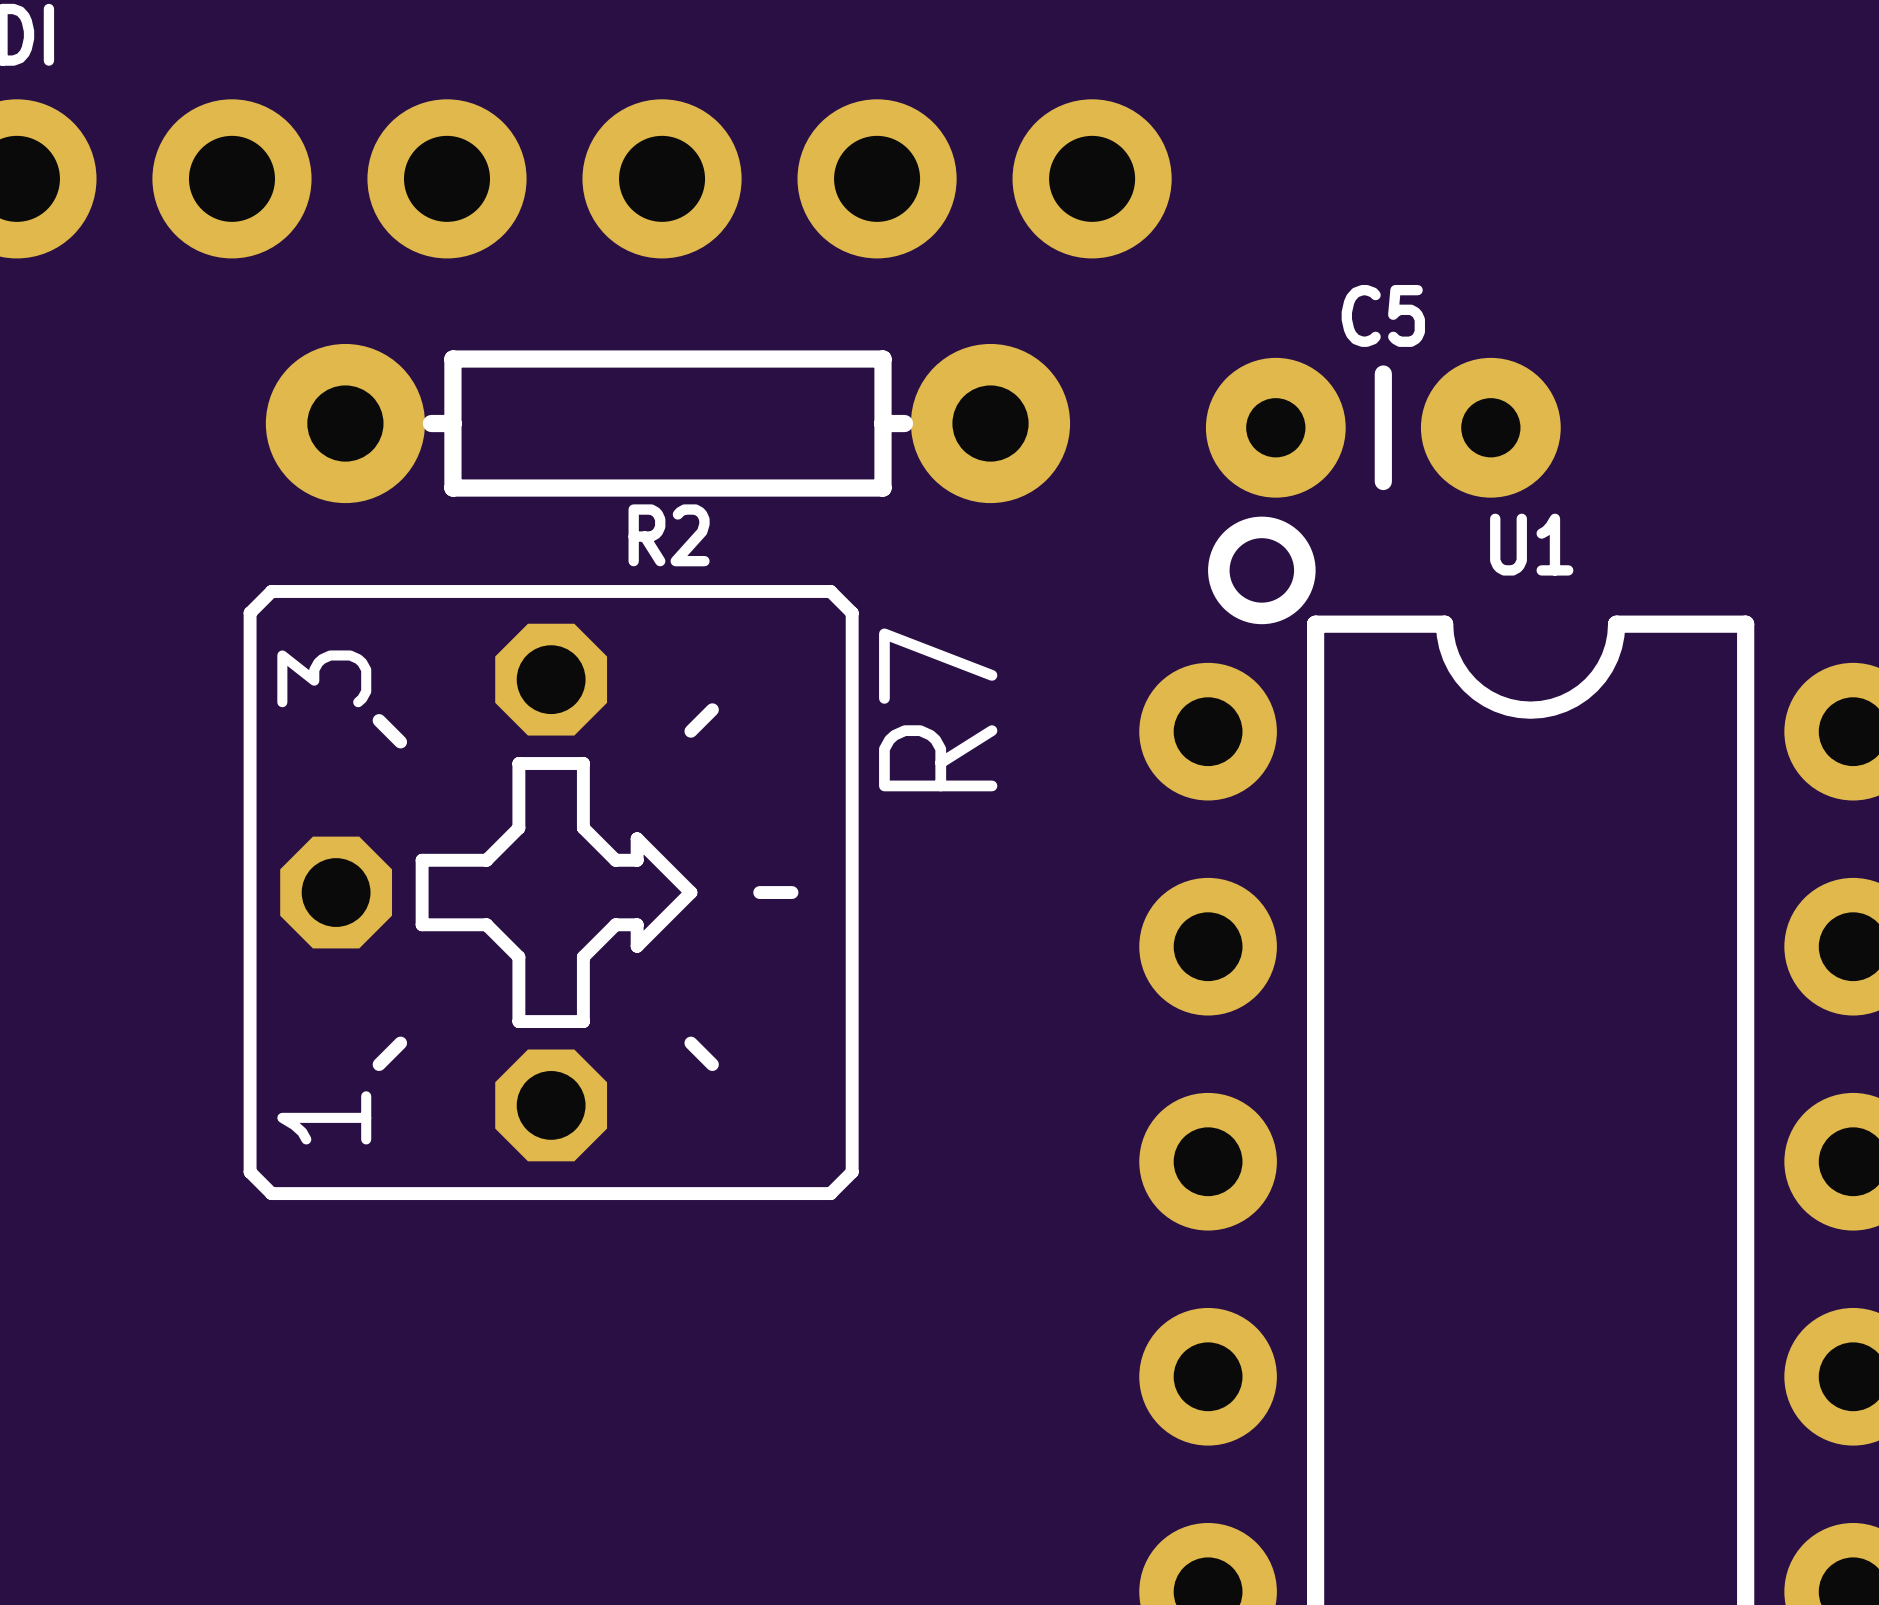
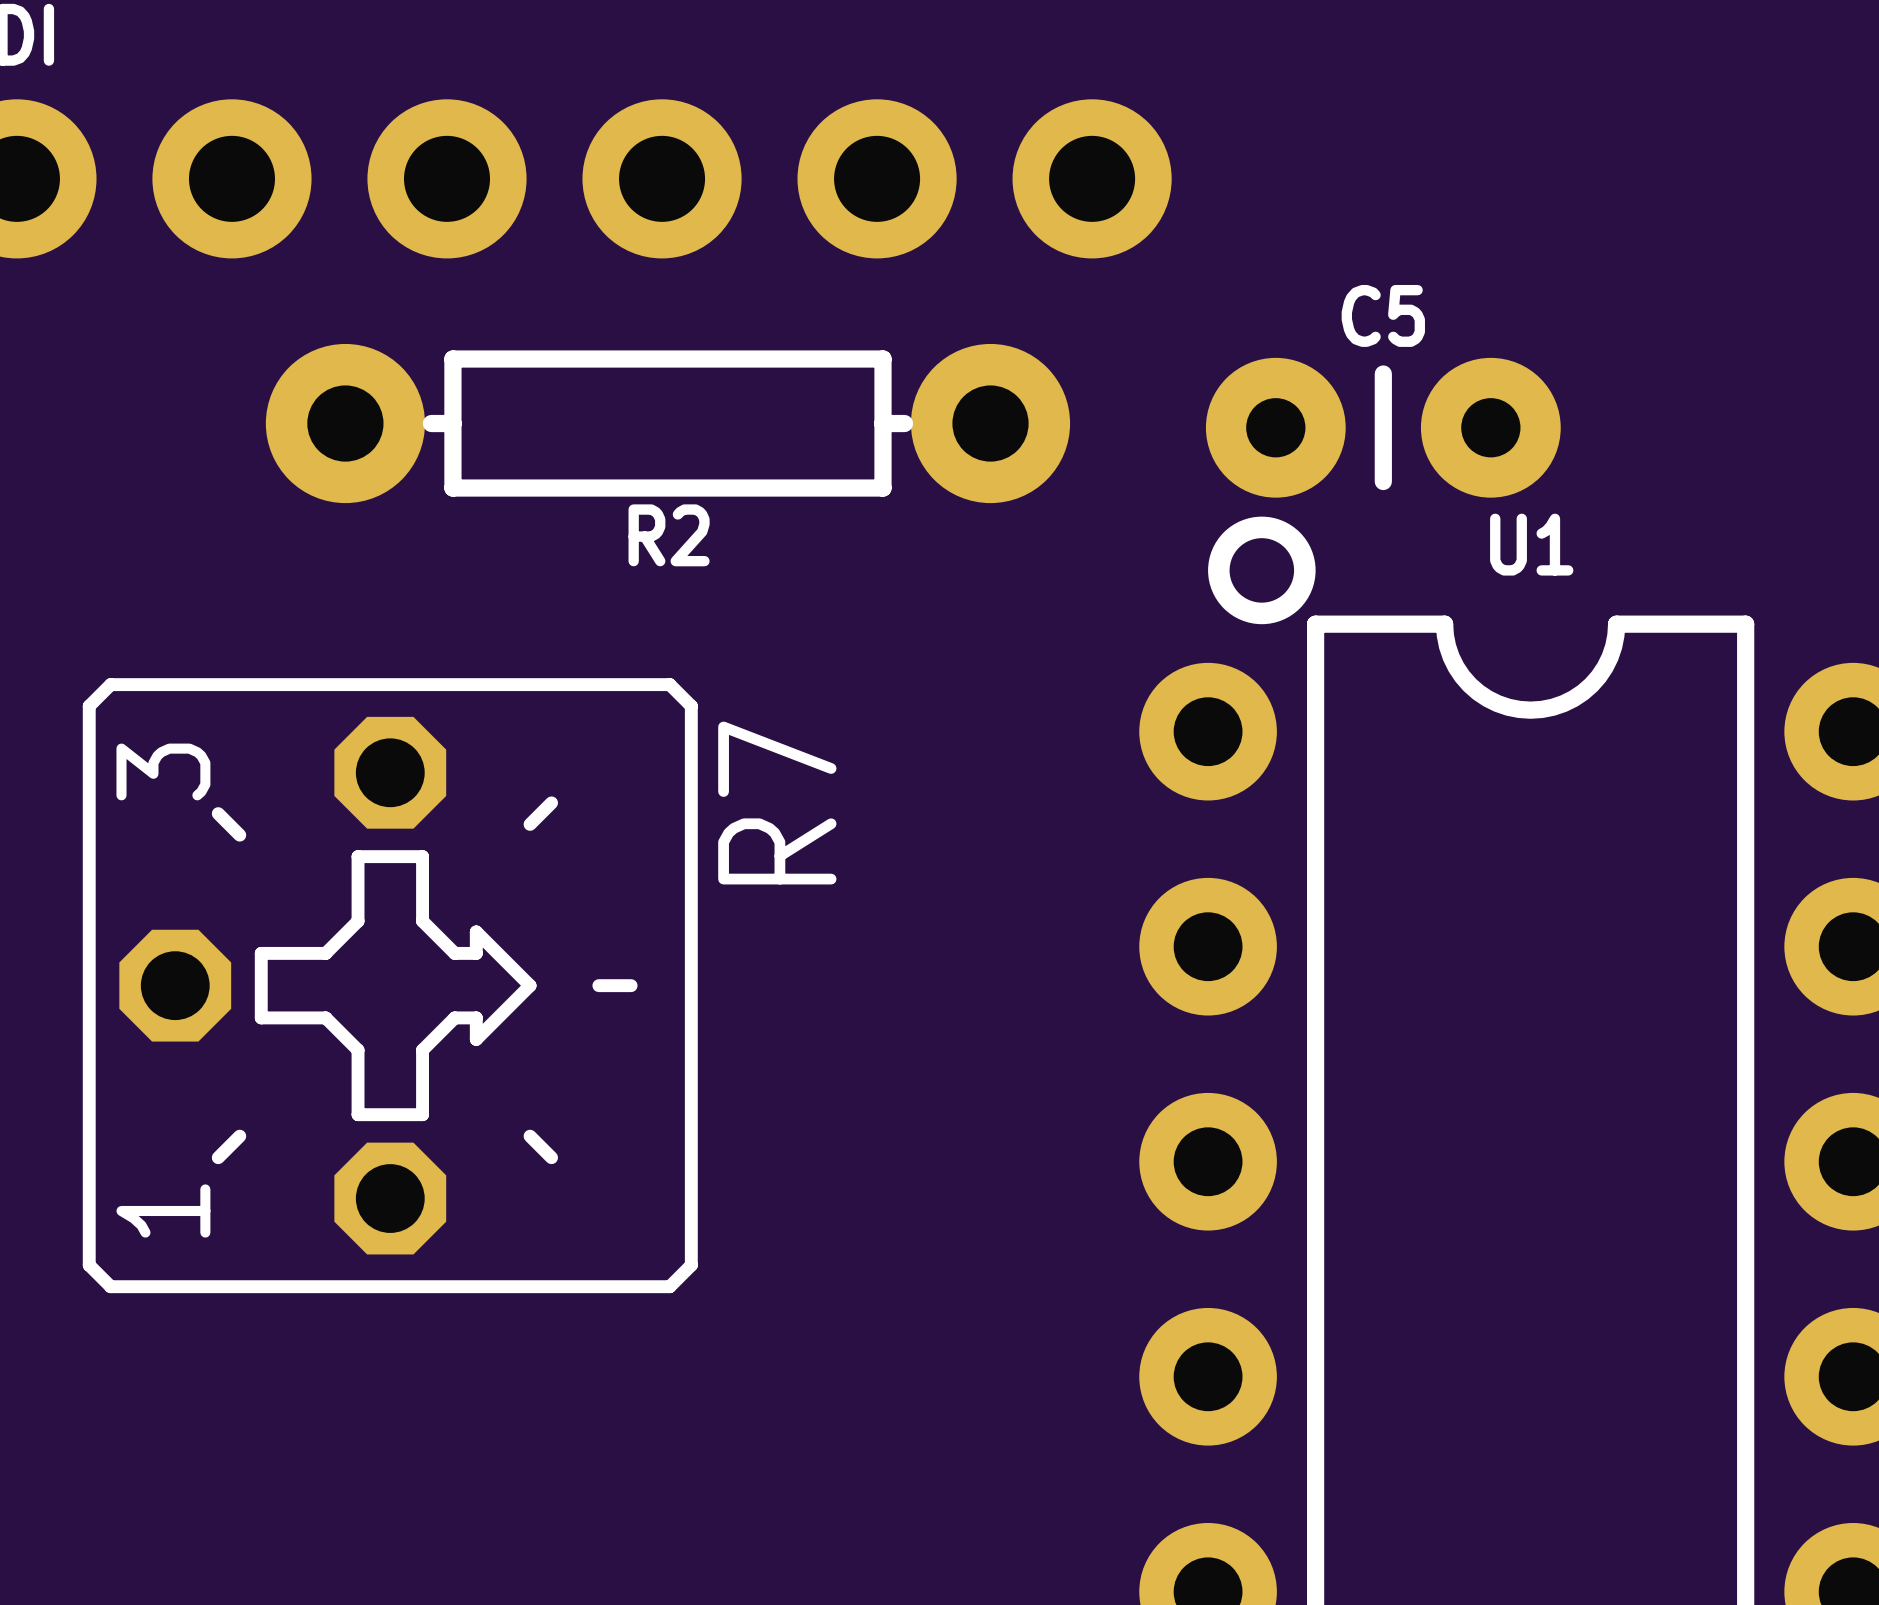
R7 position: (551, 892) -> (390, 985)

